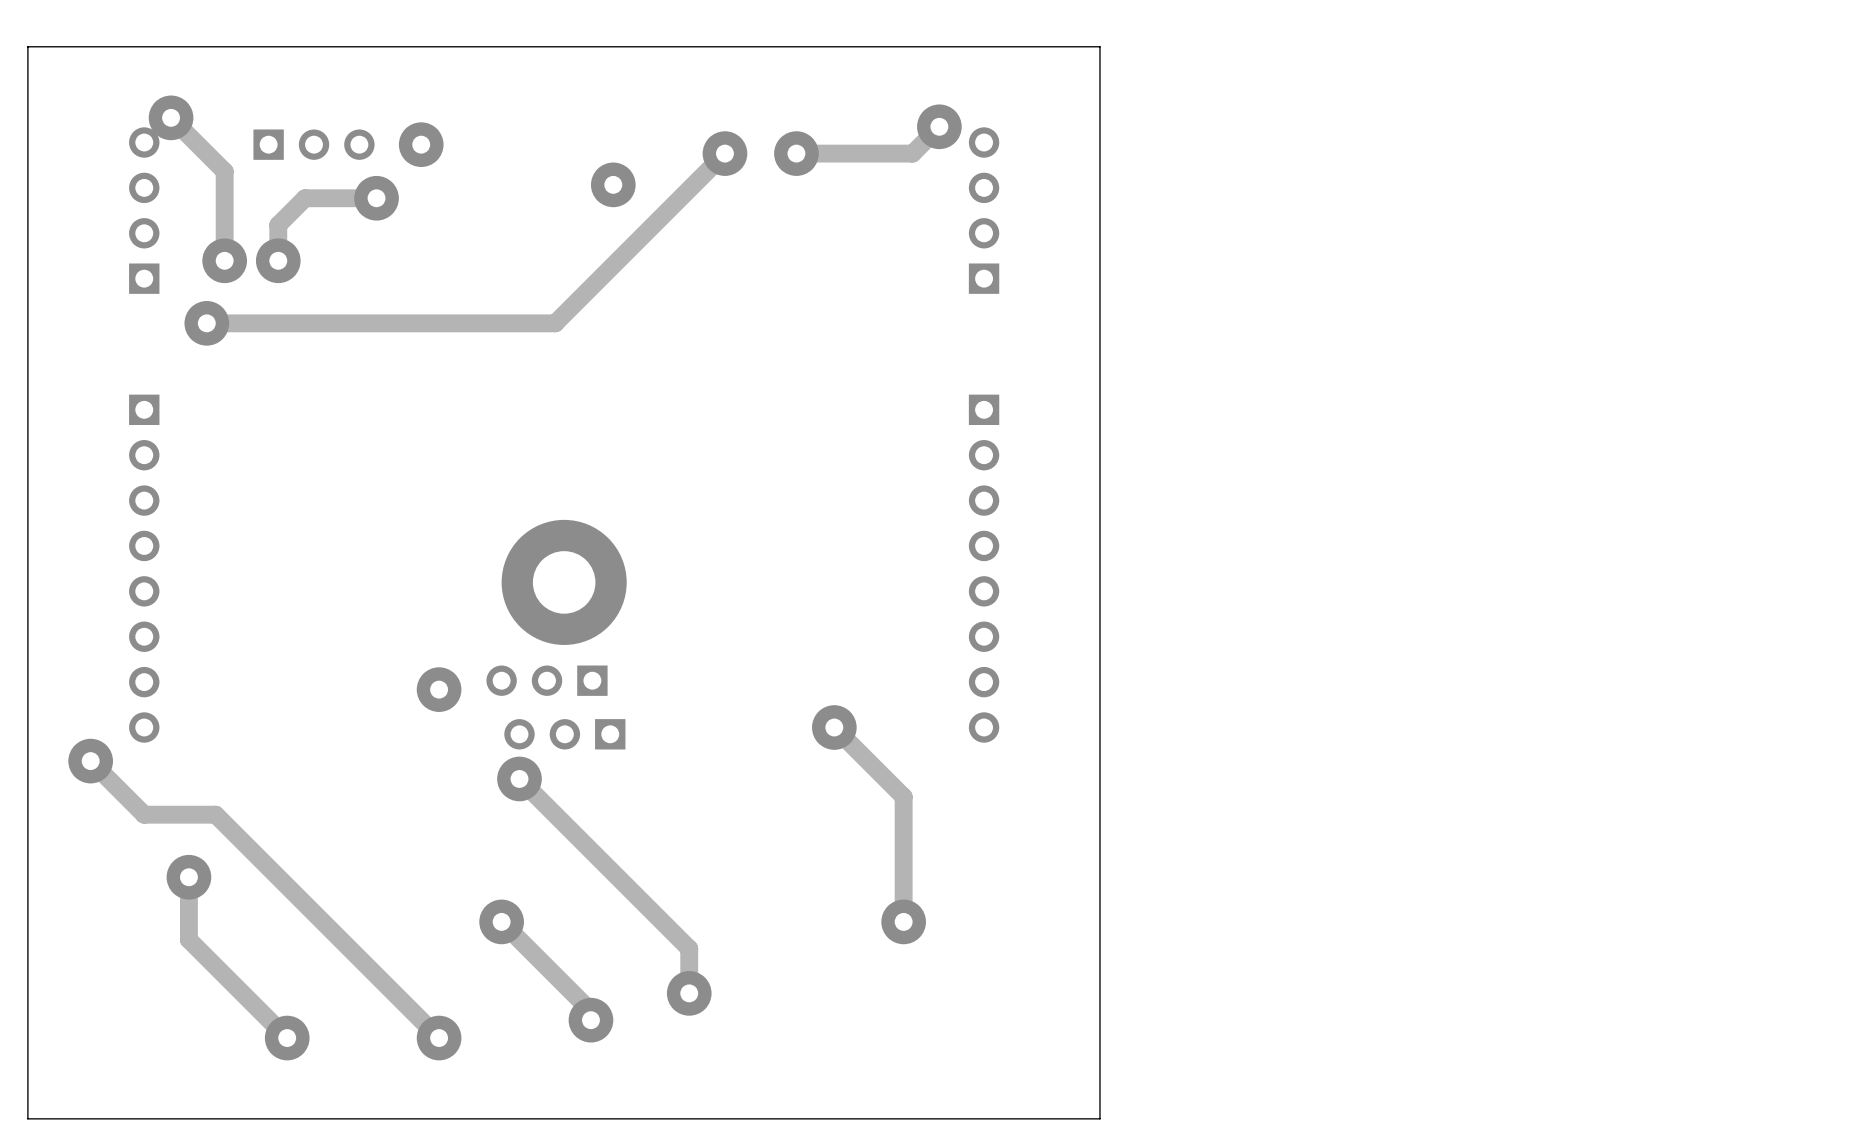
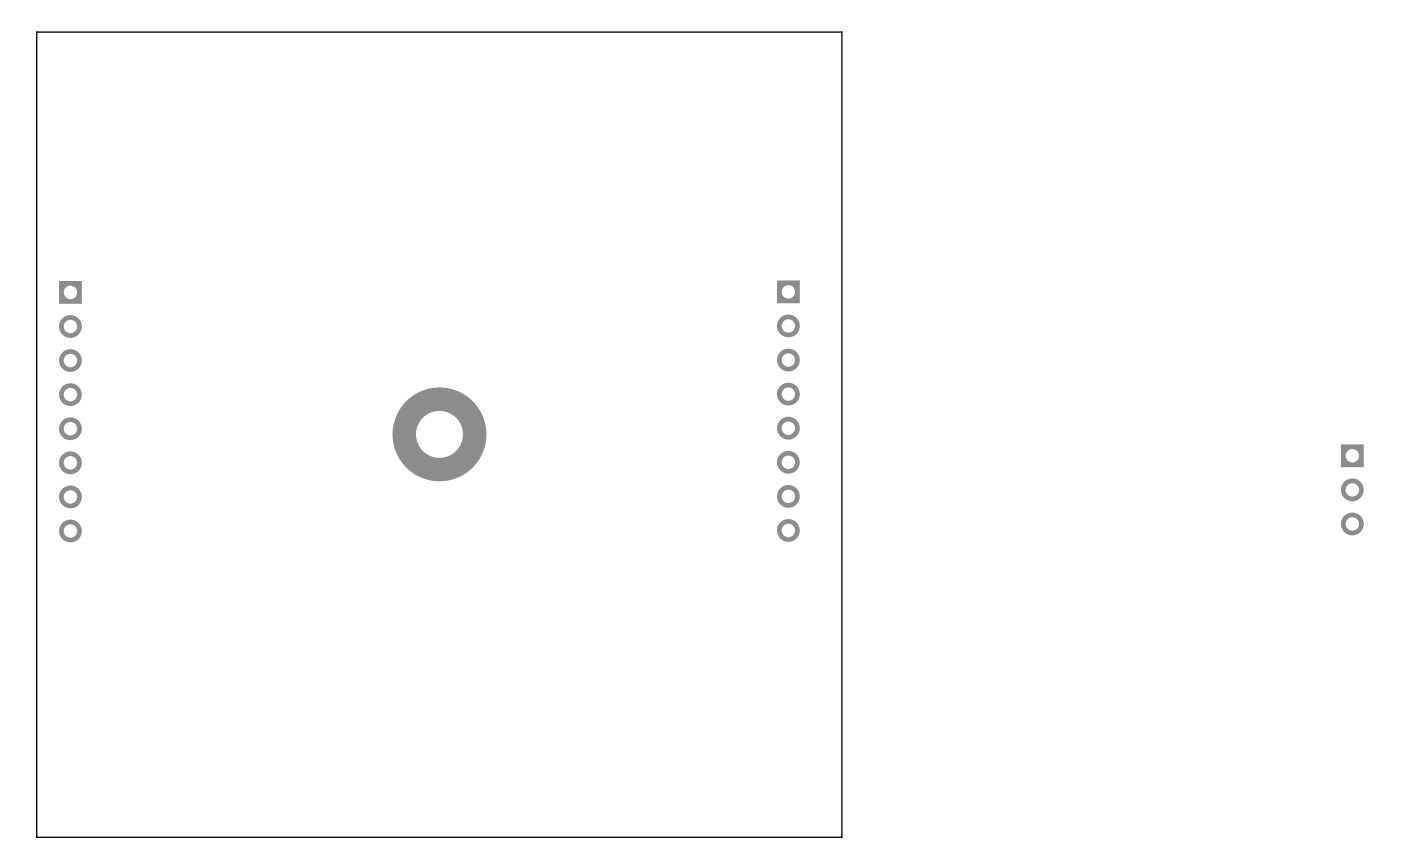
track: (171, 117) (224, 171) (224, 260) -> none
via: (171, 117) -> none
track: (939, 126) (912, 153) (796, 153) -> none
via: (939, 126) -> none
part: (314, 144) -> none
via: (421, 144) -> none
track: (724, 153) (555, 323) (206, 323) -> none
via: (724, 153) -> none
via: (796, 153) -> none
via: (613, 184) -> none
track: (376, 198) (305, 198) (278, 225) (278, 260) (273, 256) -> none
via: (376, 198) -> none
part: (144, 210) -> none
part: (984, 210) -> none
via: (224, 260) -> none
via: (278, 260) -> none
via: (206, 323) -> none
part position: (144, 568) -> (70, 411)
part position: (984, 568) -> (788, 411)
part: none -> (1352, 489)
part: (547, 680) -> none
via: (439, 689) -> none
track: (834, 727) (903, 796) (903, 921) -> none
via: (834, 727) -> none
part: (564, 734) -> none
track: (90, 761) (144, 814) (215, 814) (439, 1038) -> none
via: (90, 761) -> none
track: (510, 770) (689, 948) (689, 993) -> none
via: (519, 778) -> none
track: (188, 877) (188, 939) (287, 1038) -> none
via: (188, 877) -> none
track: (501, 921) (590, 1011) (590, 1020) -> none
via: (501, 921) -> none
via: (903, 921) -> none
via: (689, 993) -> none
via: (590, 1020) -> none
via: (287, 1038) -> none
via: (439, 1038) -> none

